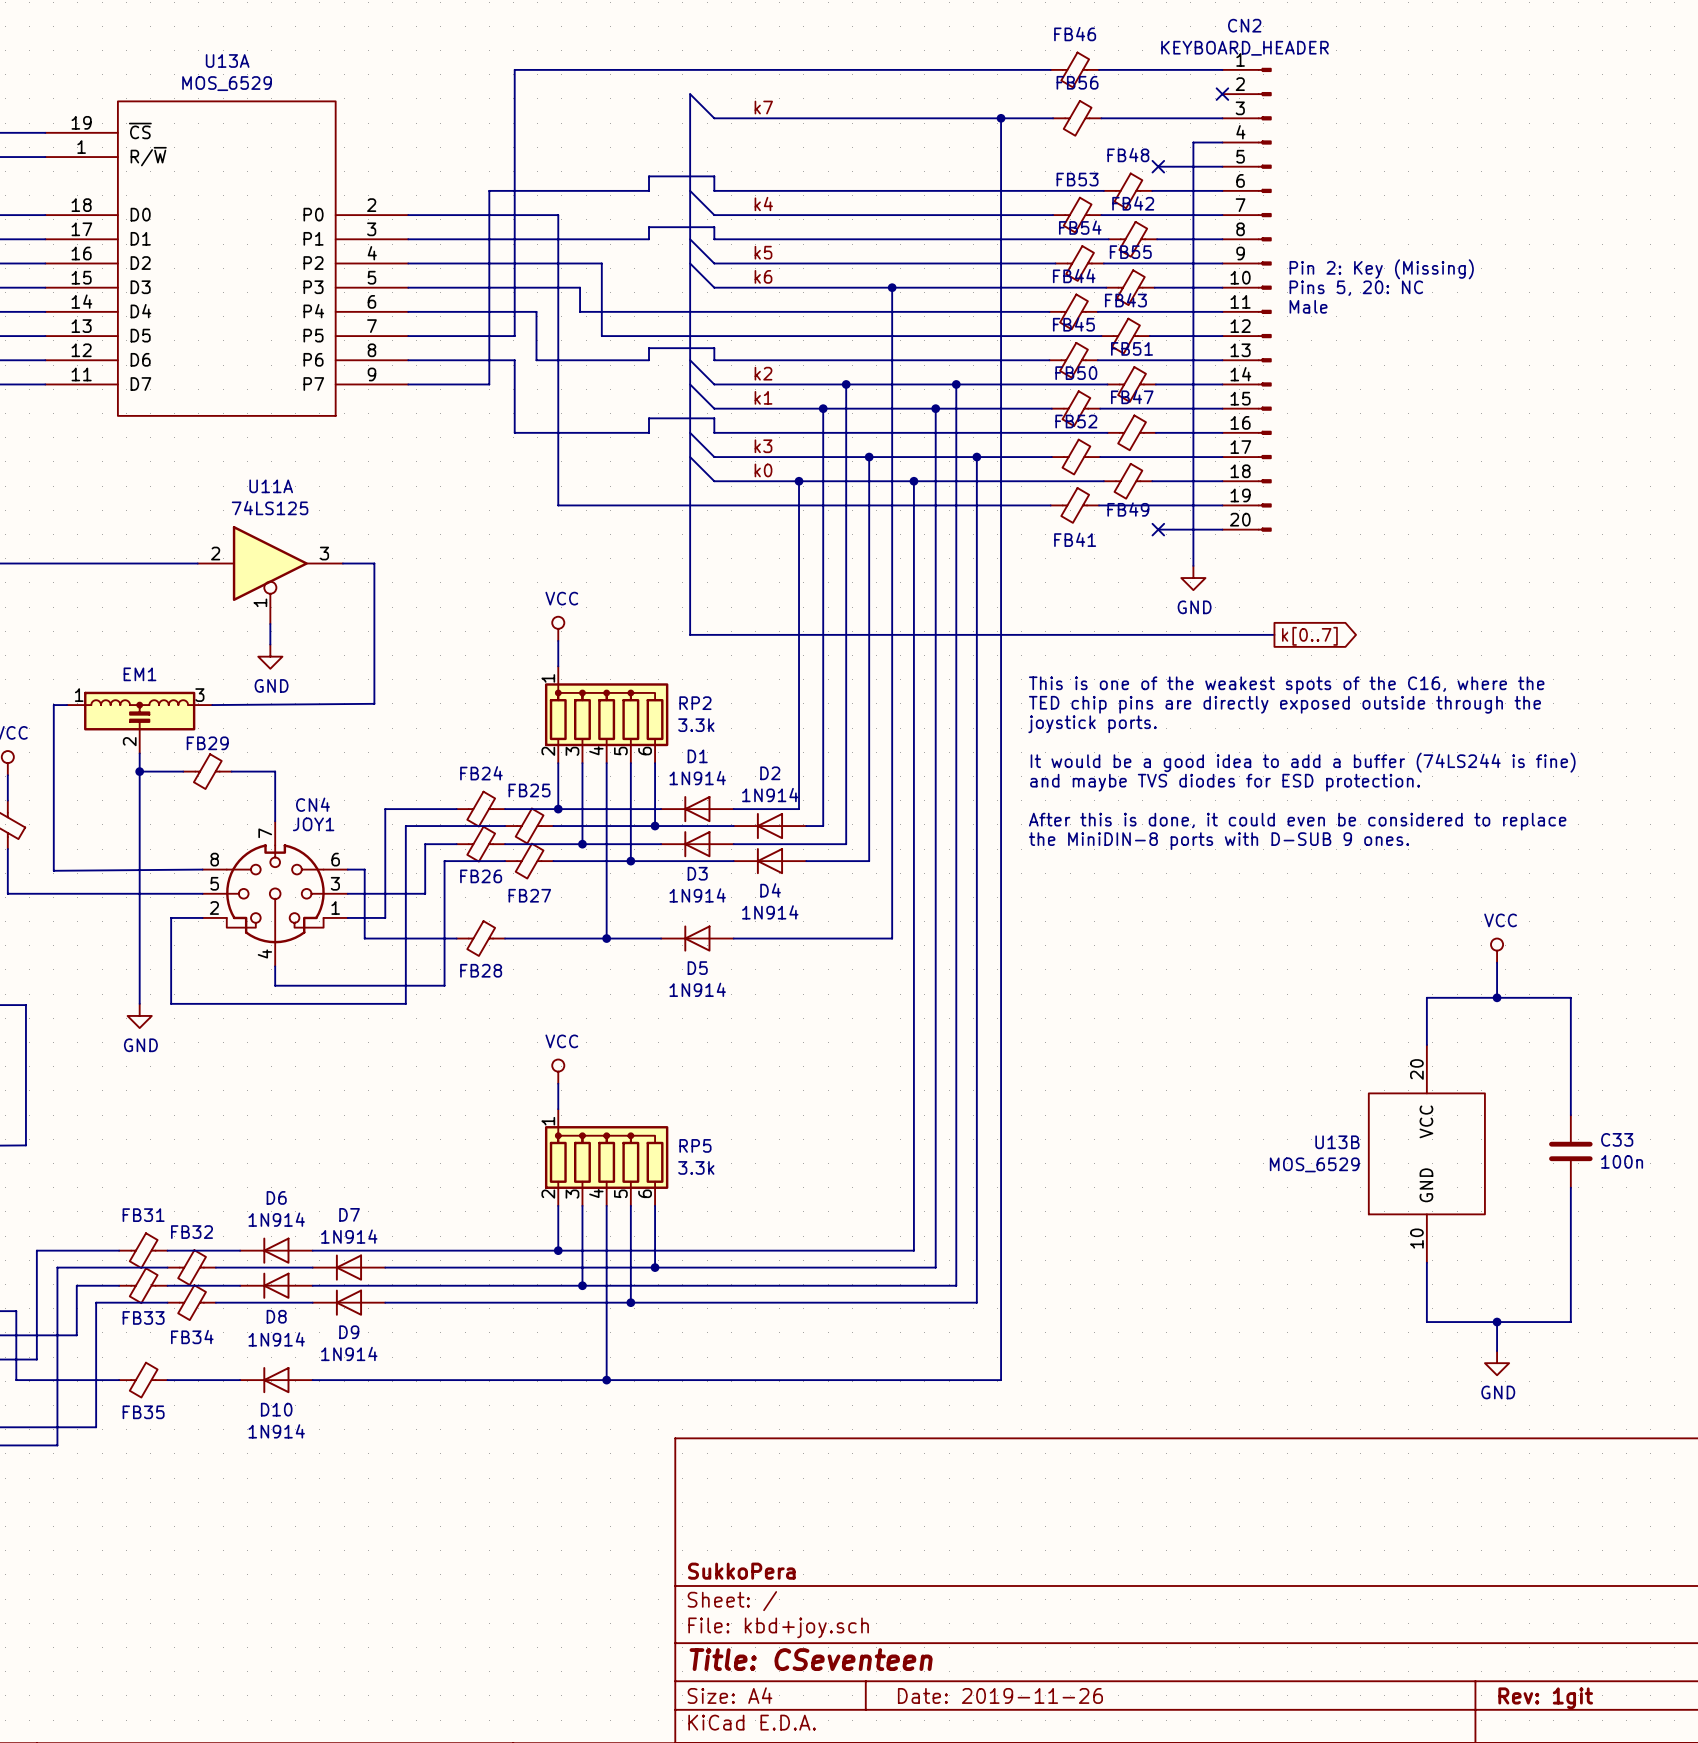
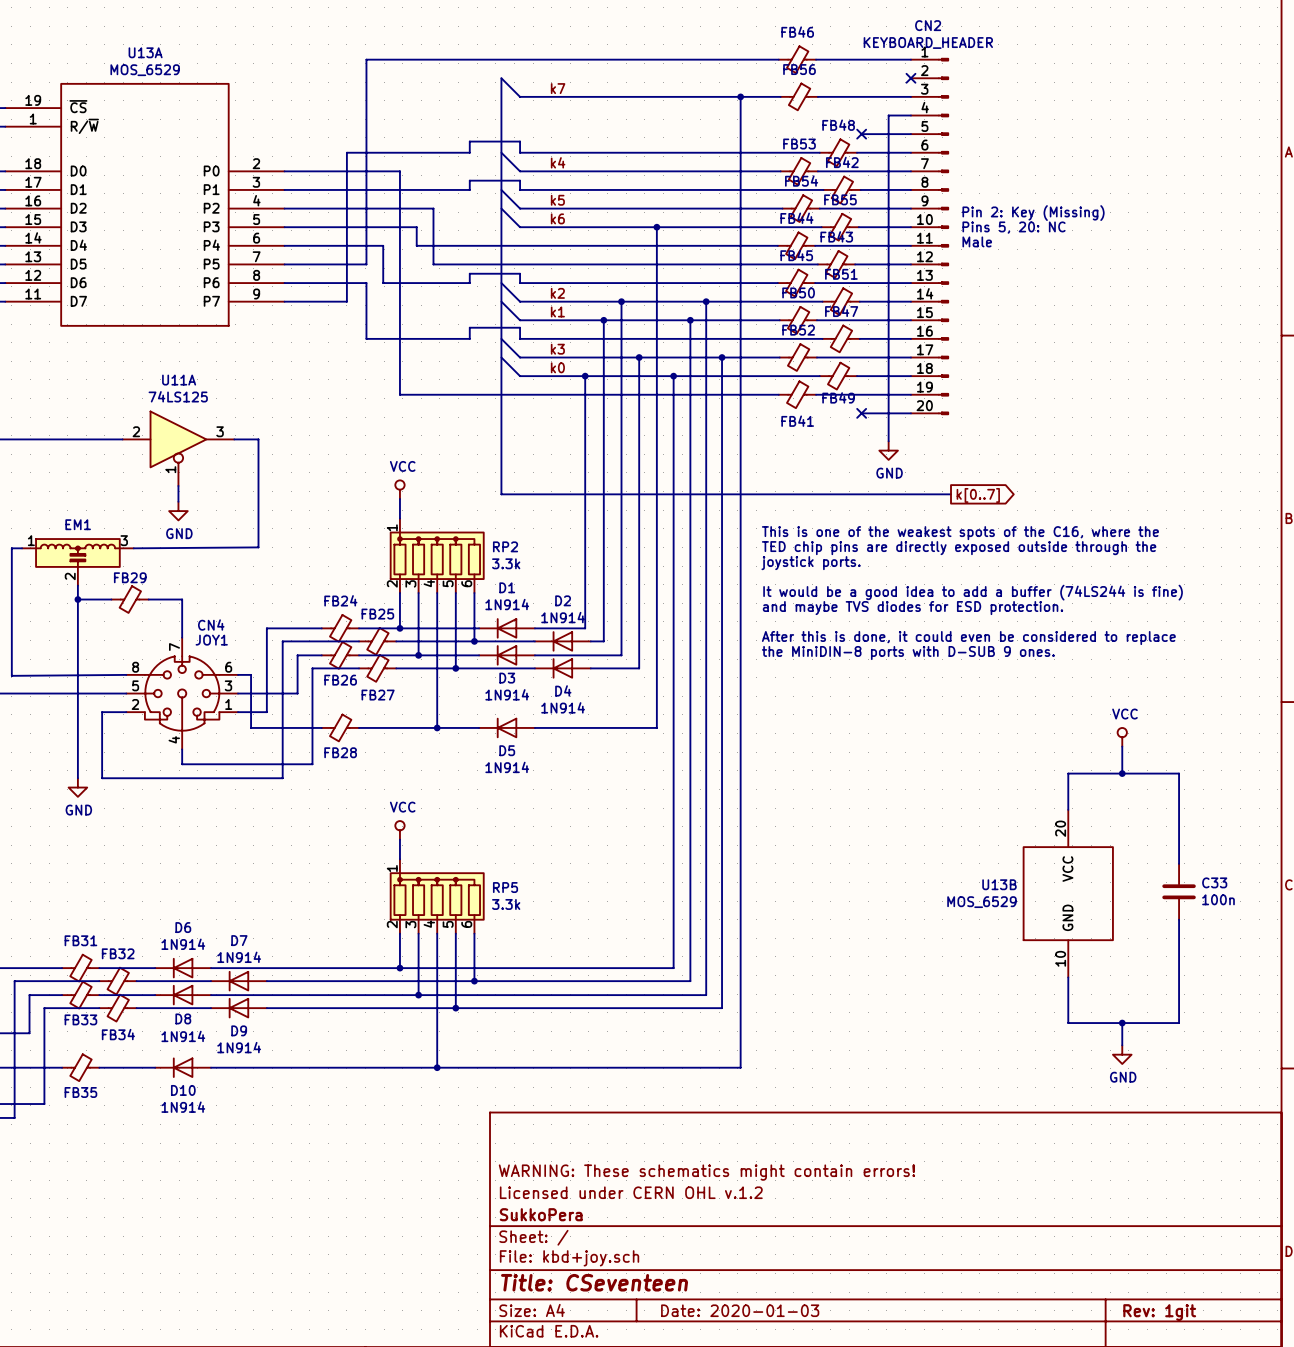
title block: none -> WARNING: These schematics might contain errors! (706, 1172)
title block: none -> Licensed under CERN OHL v.1.2 (631, 1192)
title block: Date: 2019-11-26 (1000, 1695) -> Date: 2020-01-03 (740, 1310)

